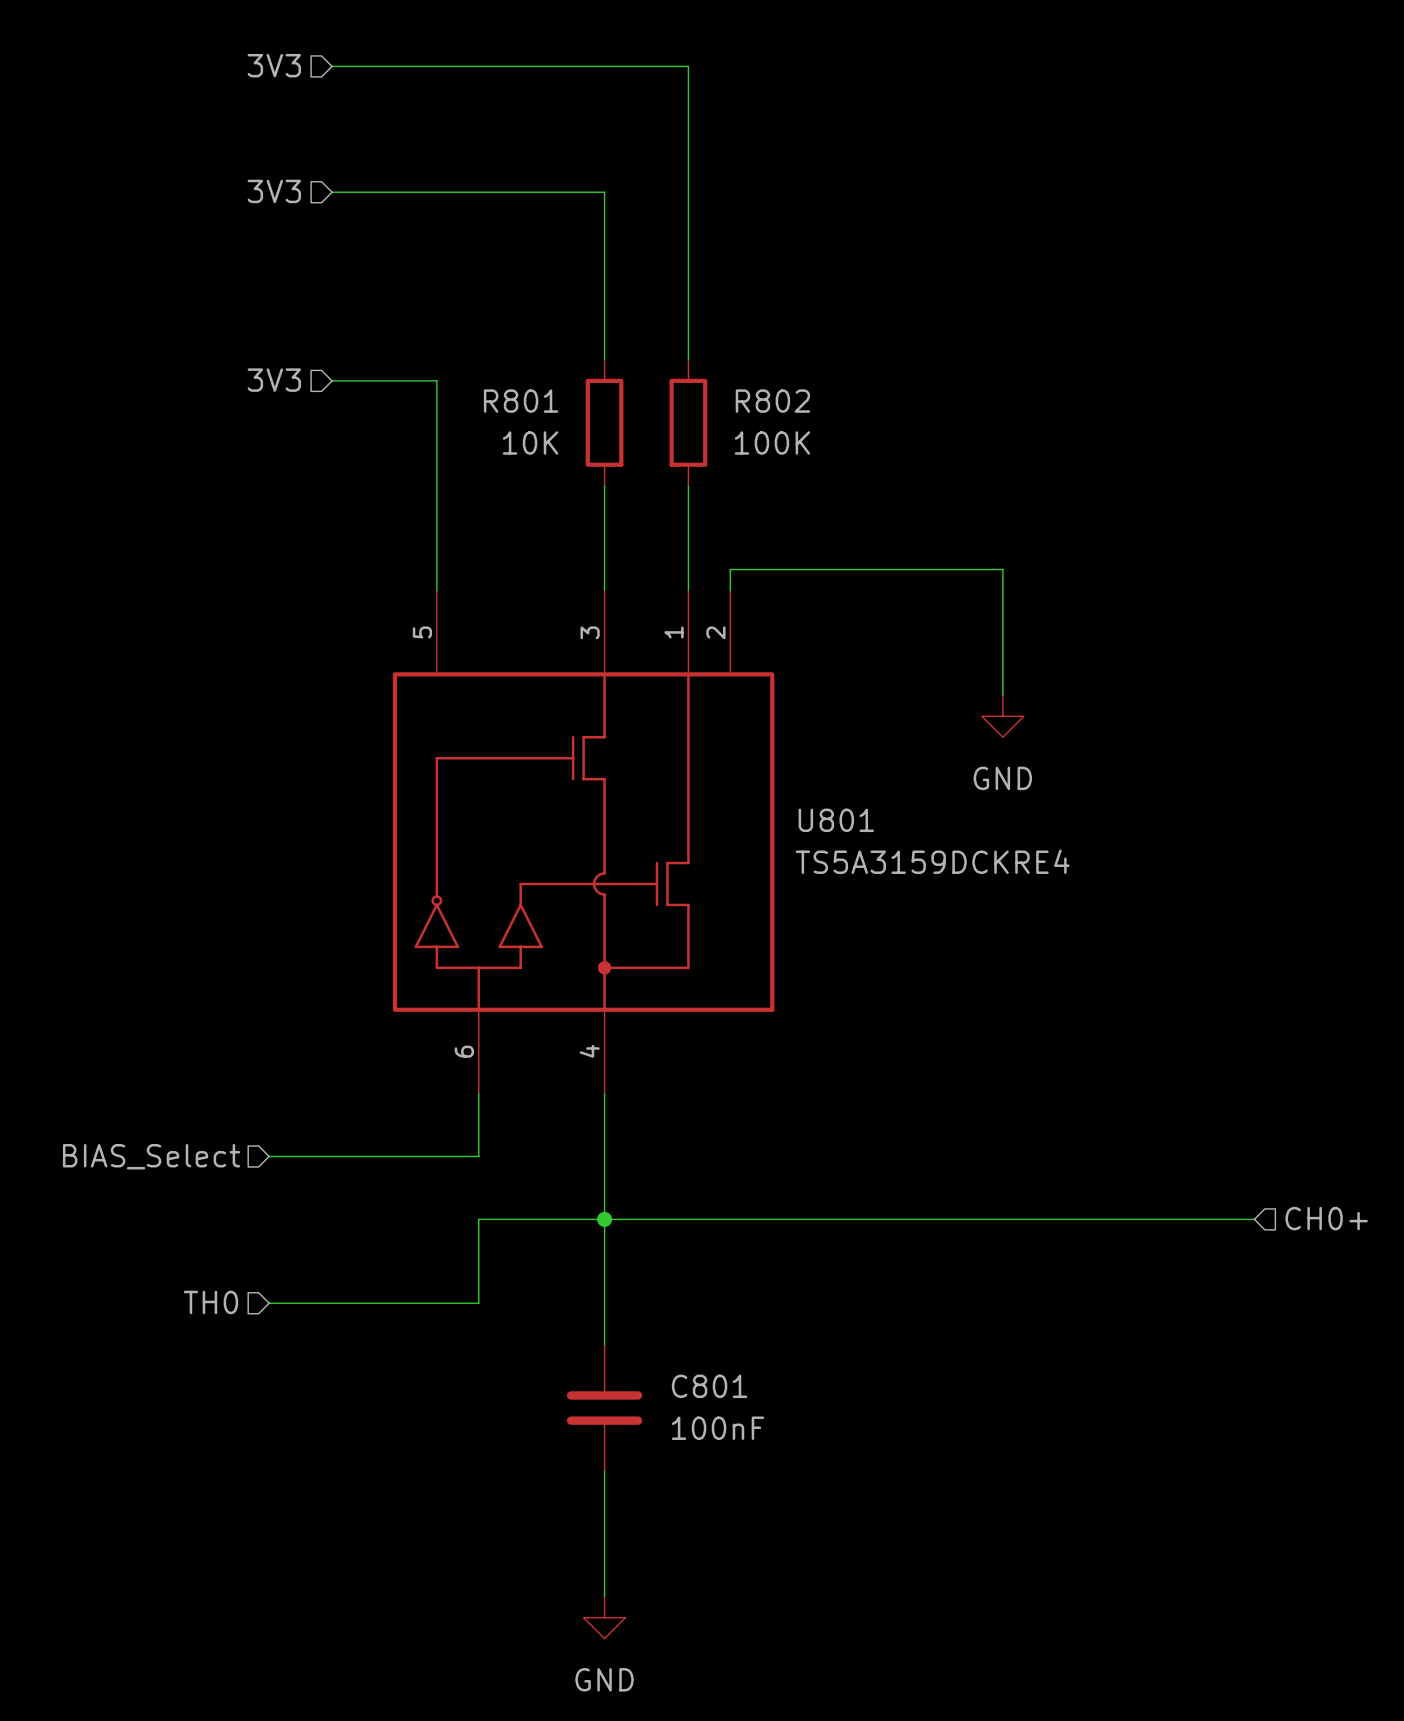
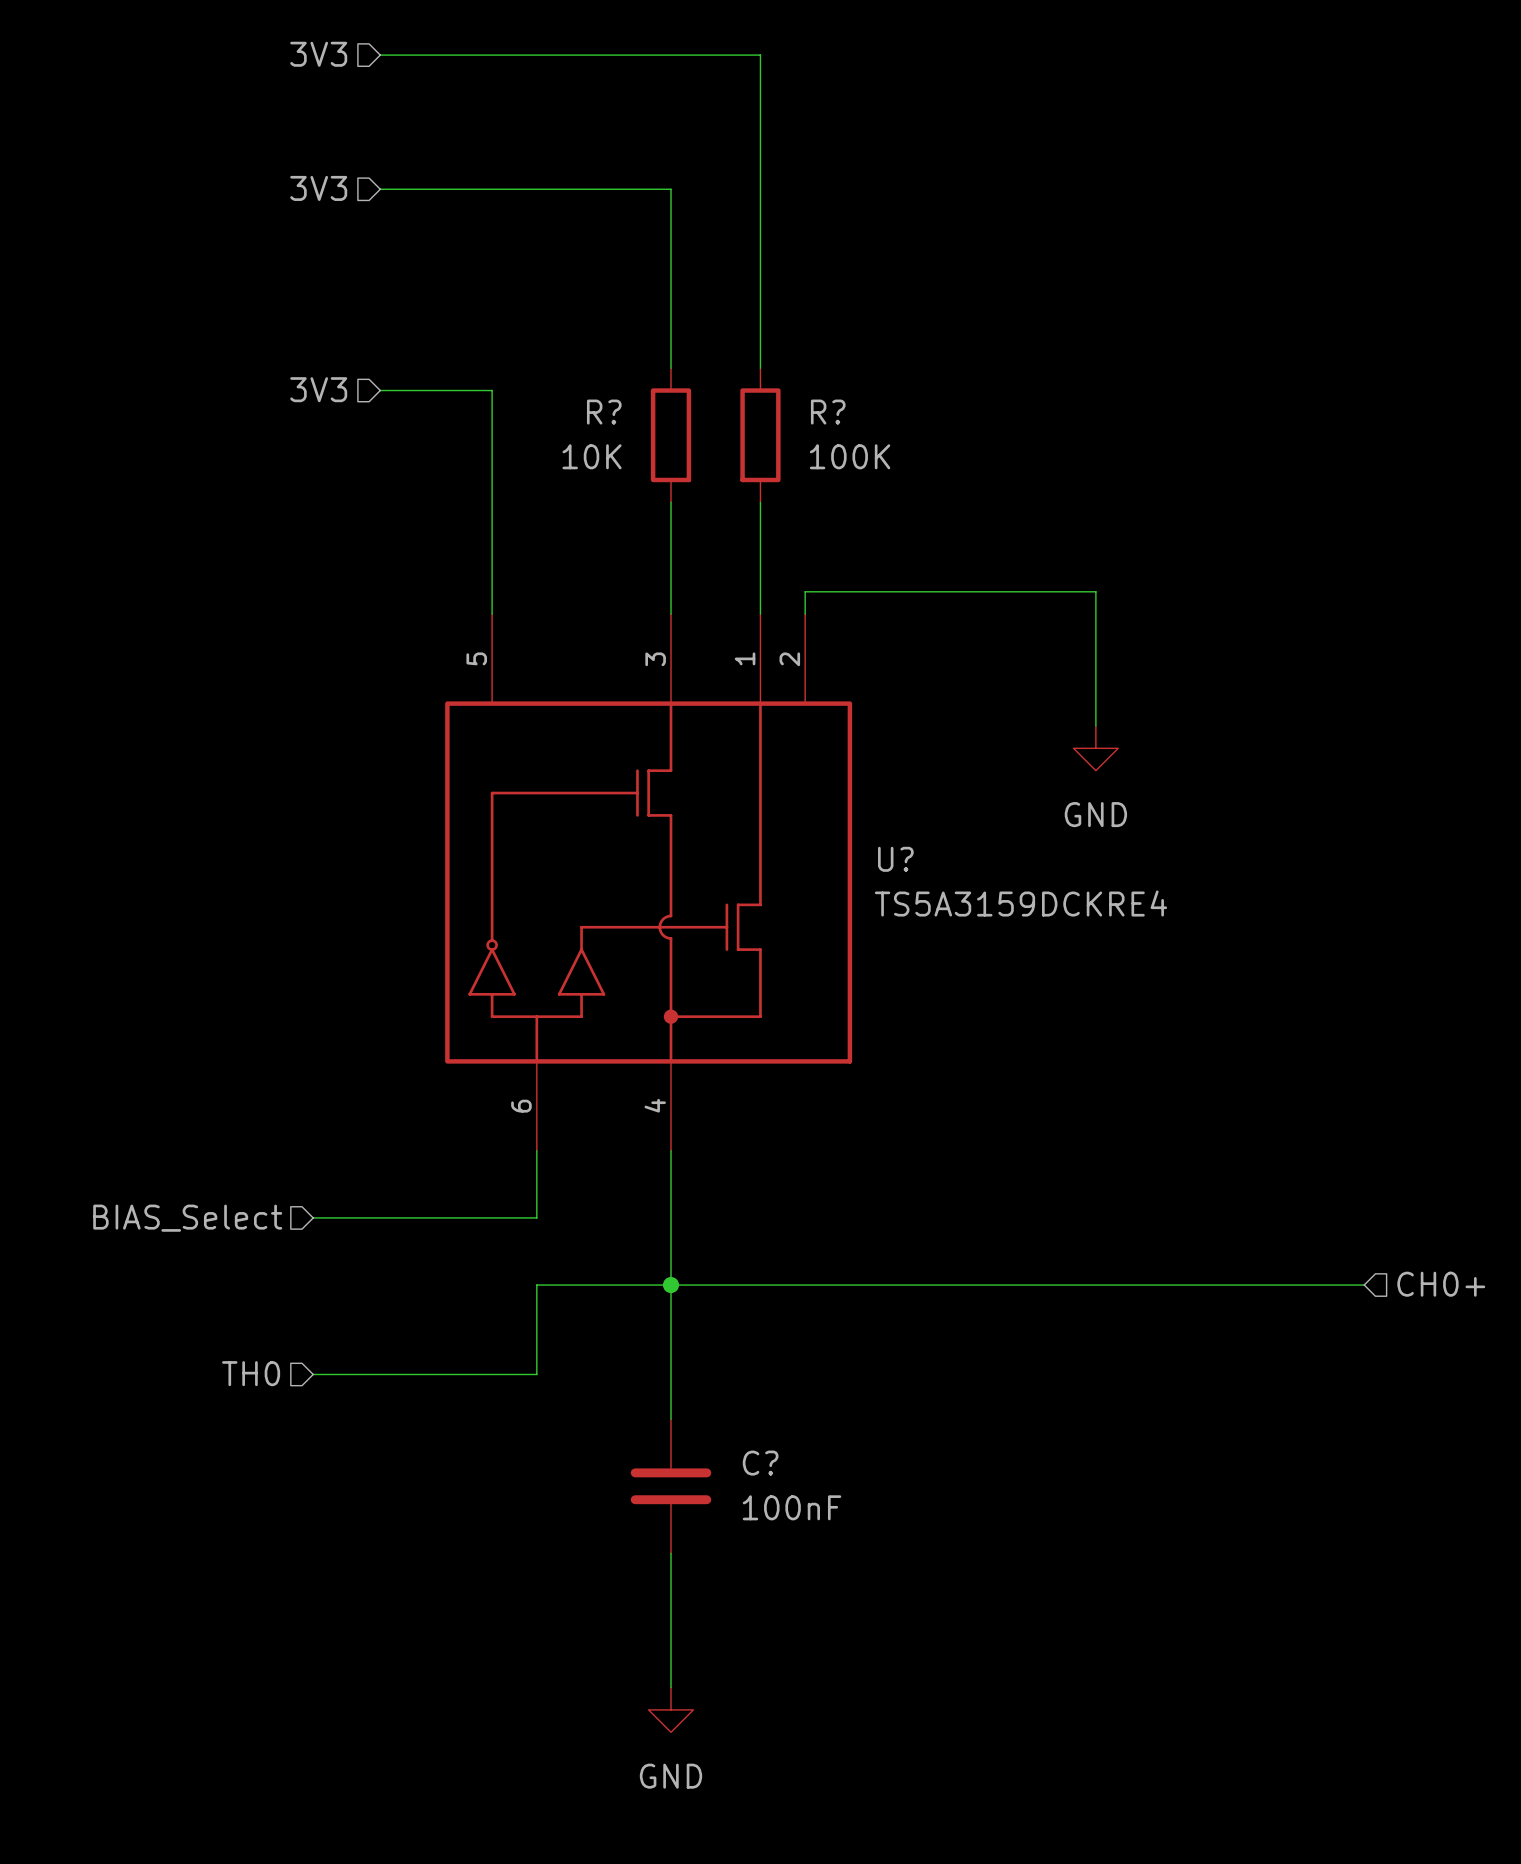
R801 name: R801 (521, 401) -> R? (604, 412)
R802 name: R802 (772, 401) -> R? (828, 412)
U801 name: U801 (836, 820) -> U? (895, 859)
C801 name: C801 (709, 1386) -> C? (760, 1463)

